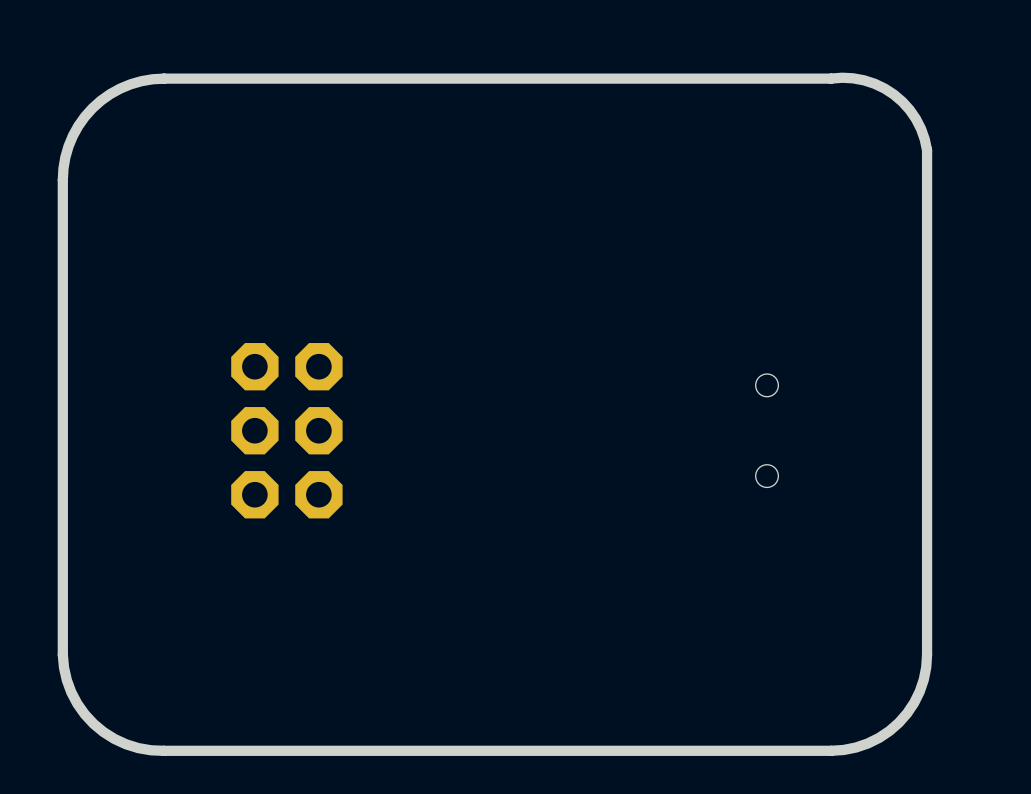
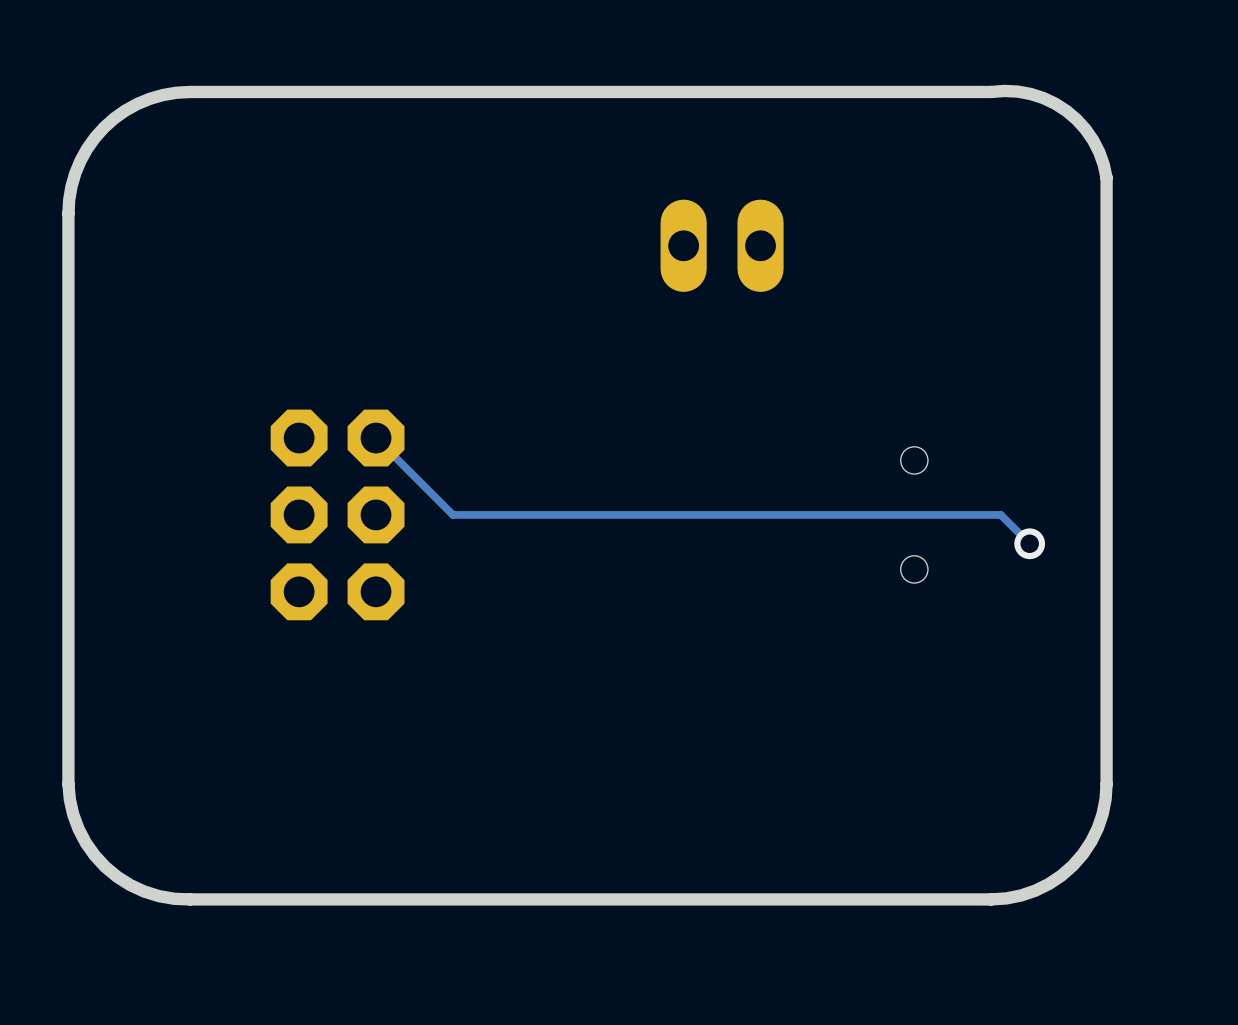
part: none -> (722, 245)
track: none -> (376, 438) (452, 514) (1000, 514) (1029, 543)
via: none -> (1029, 543)

